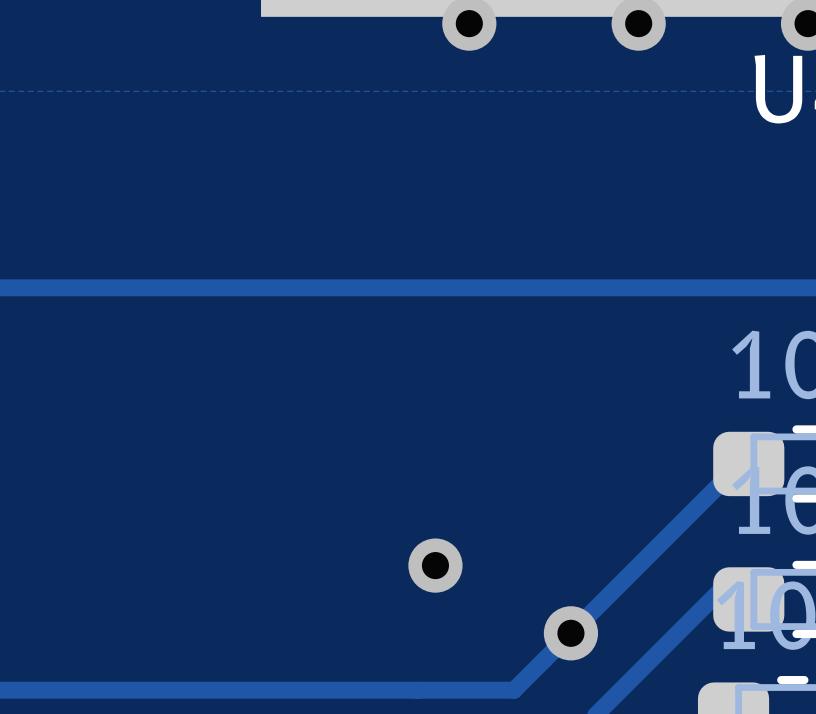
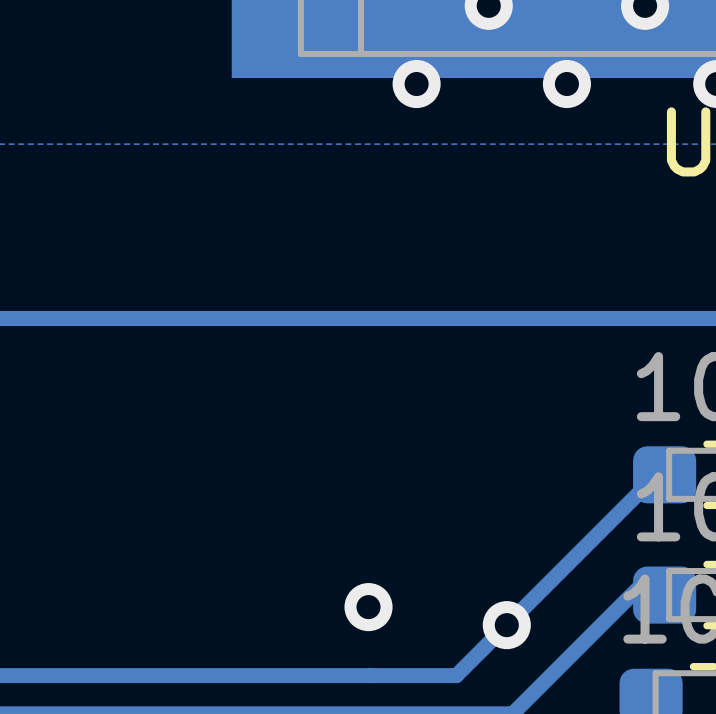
via position: (435, 565) -> (368, 607)

